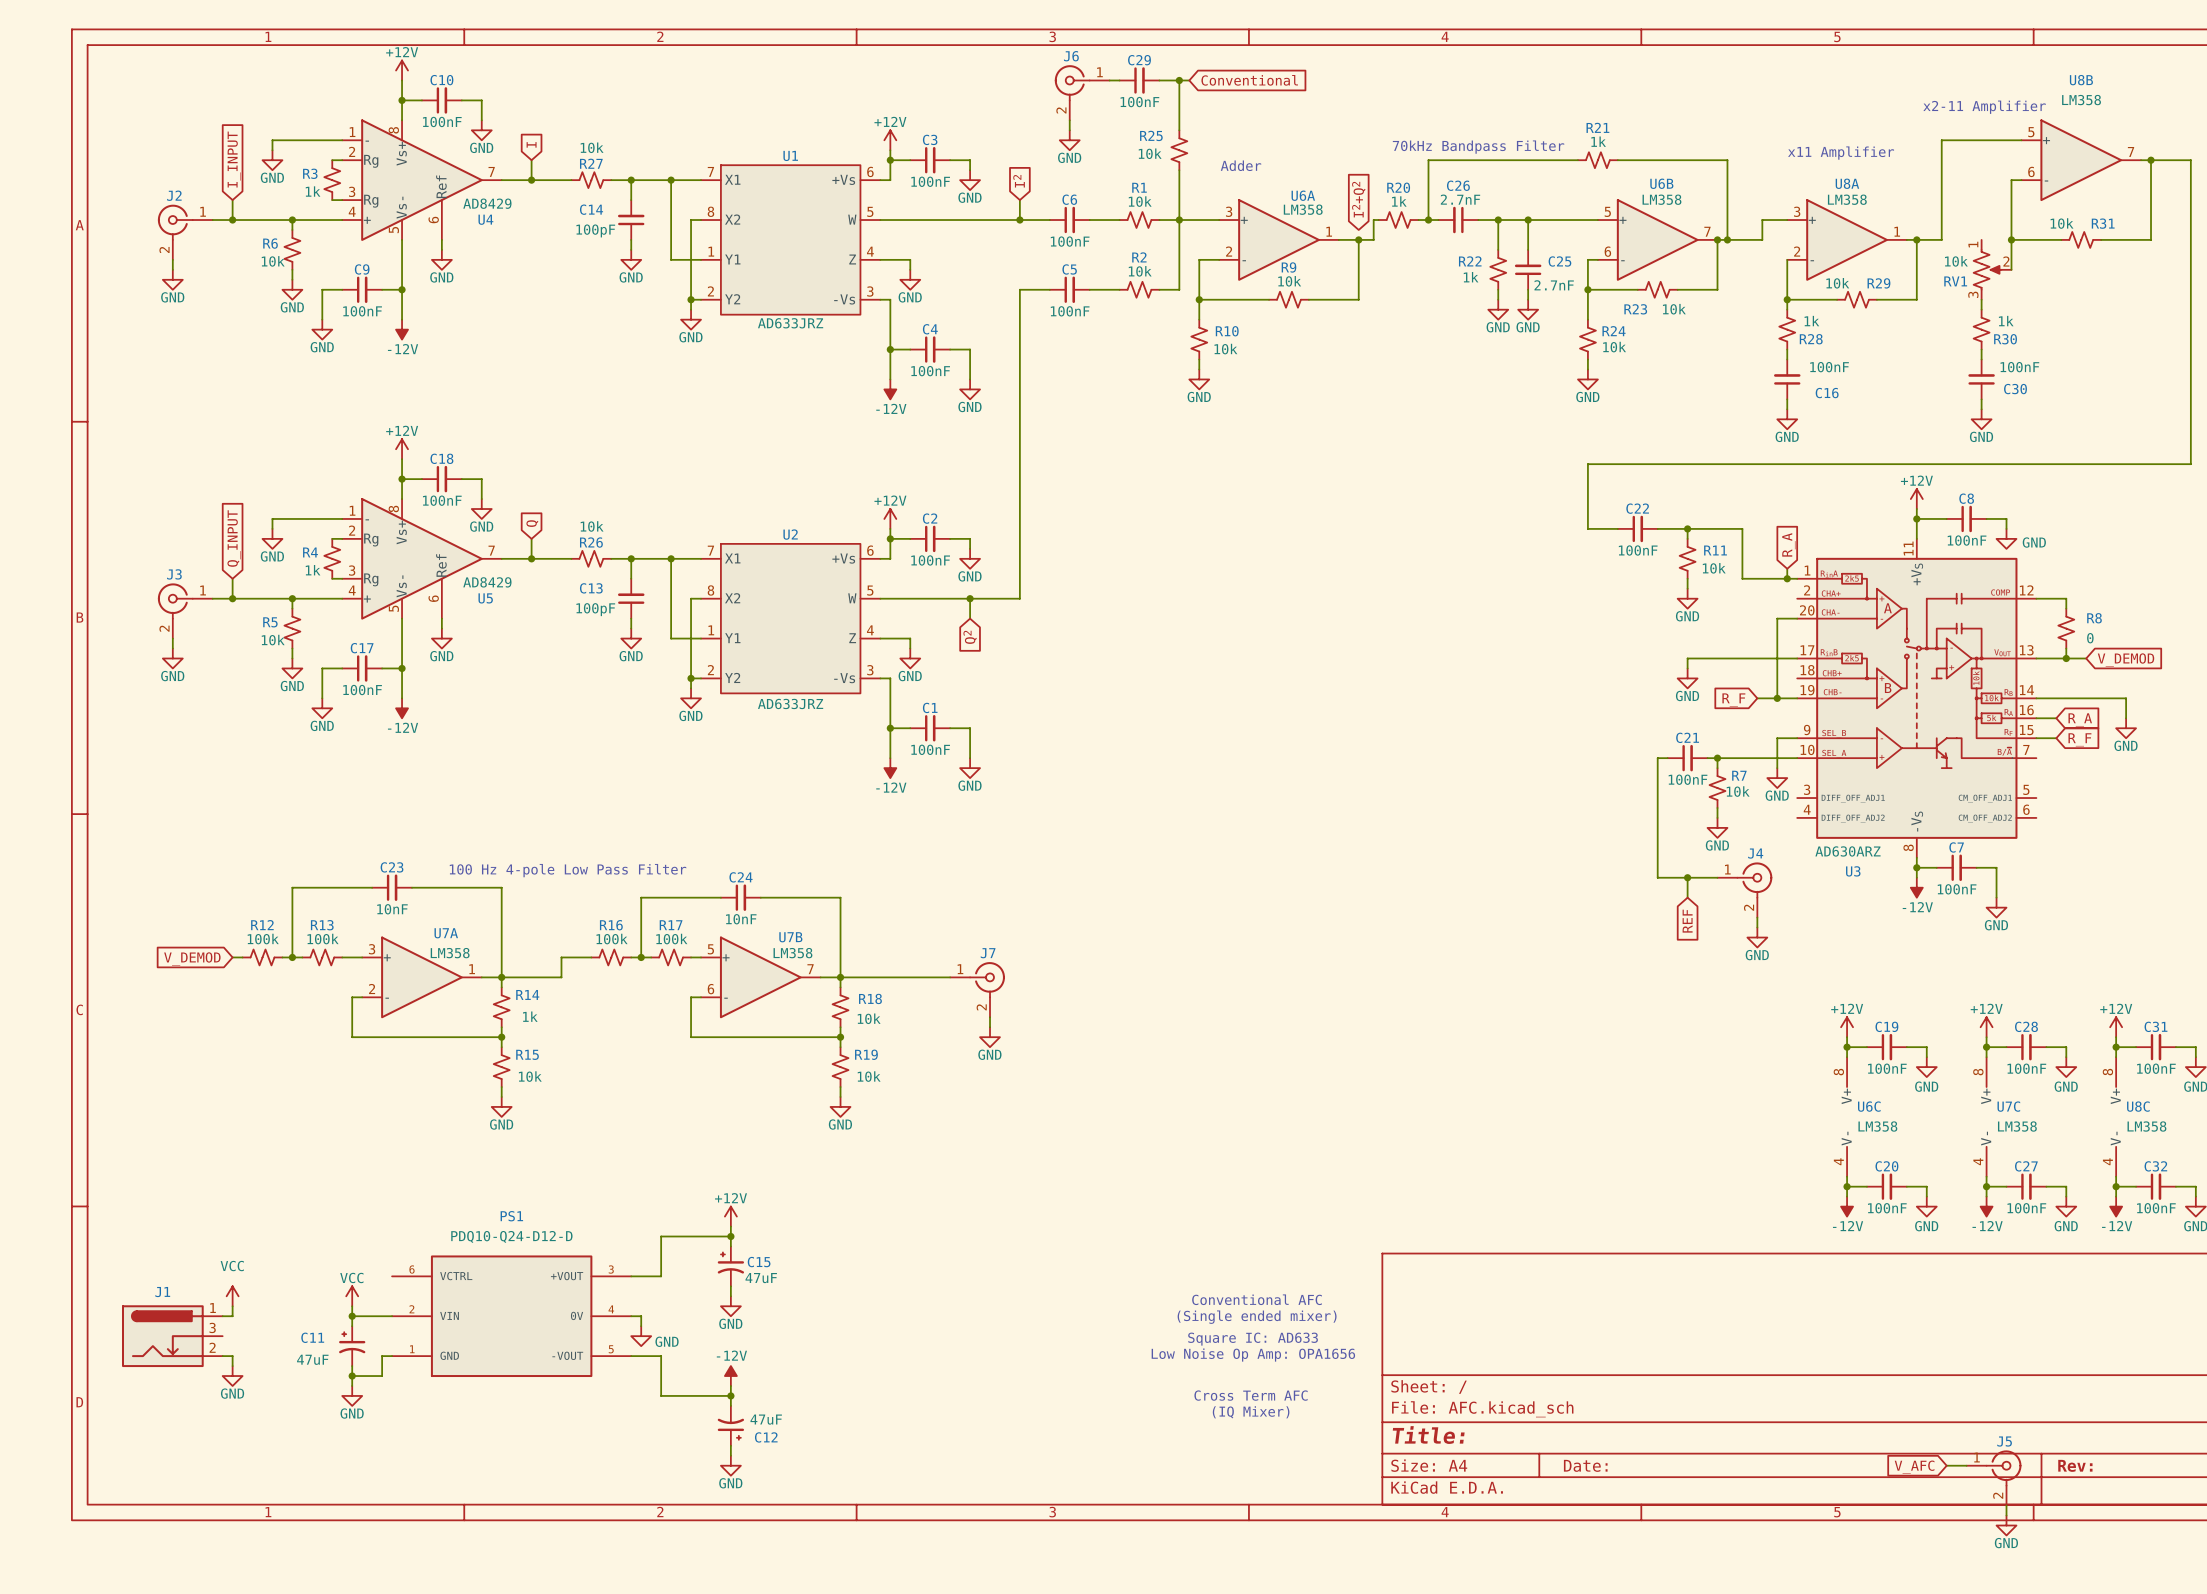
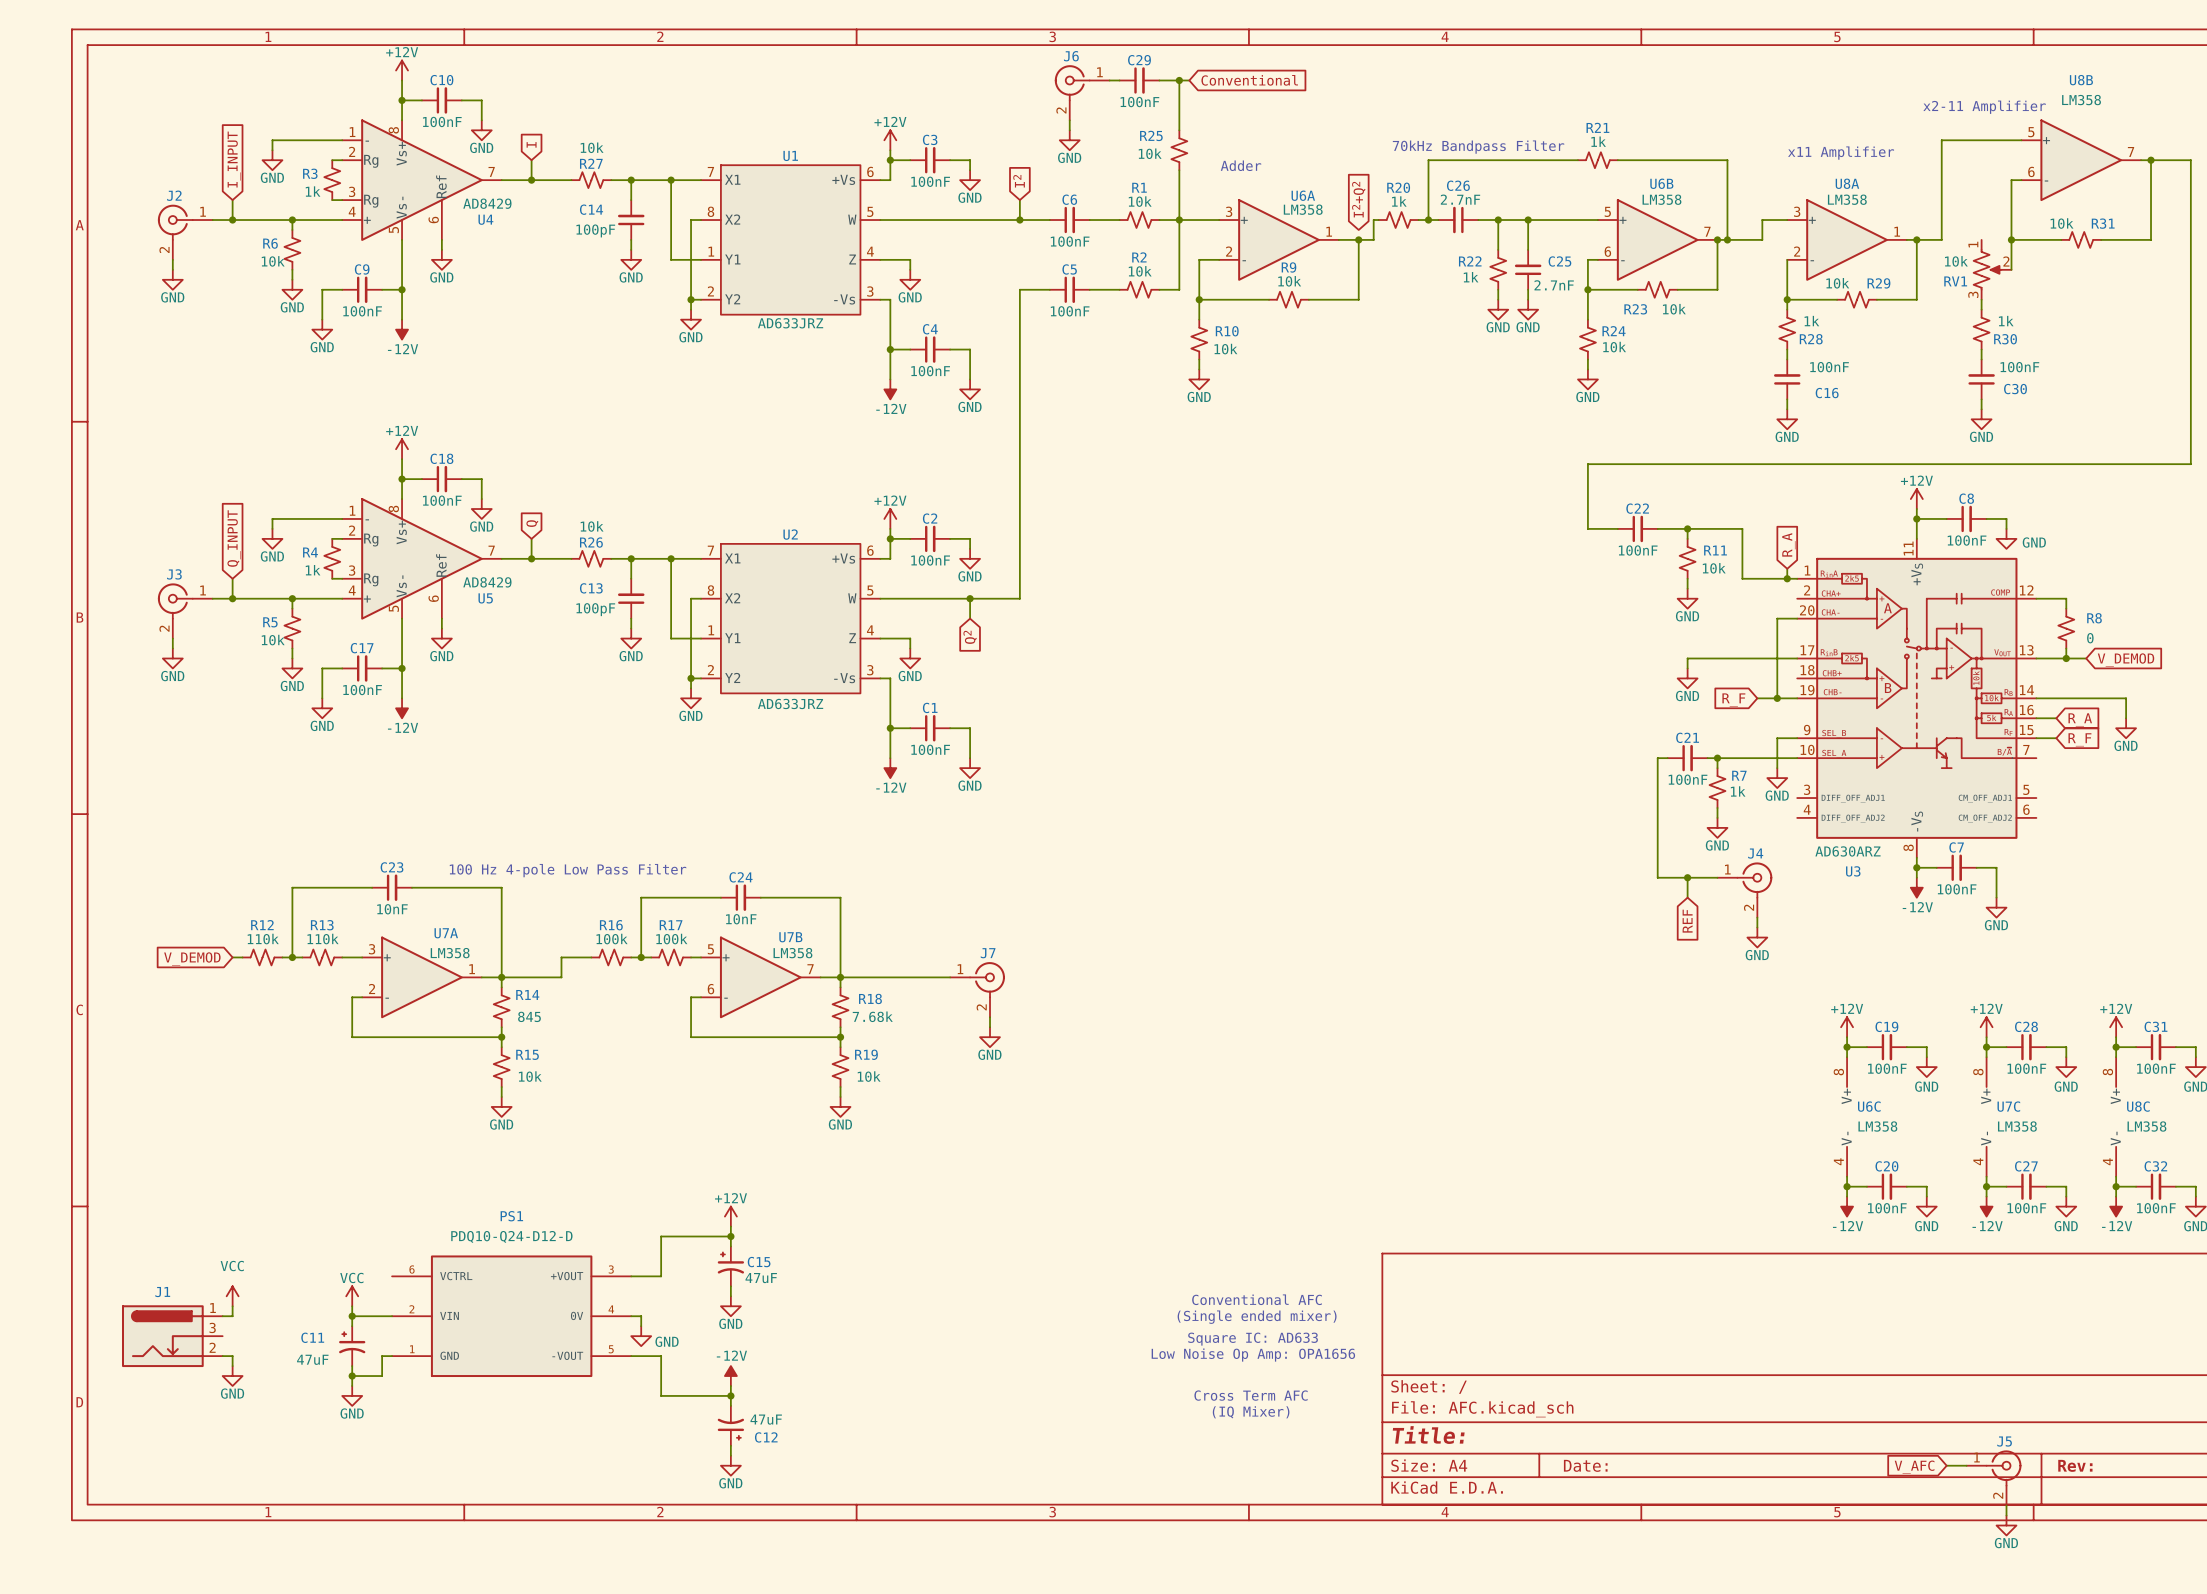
R7 value: 10k (1738, 791) -> 1k (1738, 791)
R12 value: 100k (263, 939) -> 110k (263, 939)
R13 value: 100k (323, 939) -> 110k (323, 939)
R14 value: 1k (530, 1016) -> 845 (529, 1016)
R18 value: 10k (869, 1018) -> 7.68k (872, 1016)

